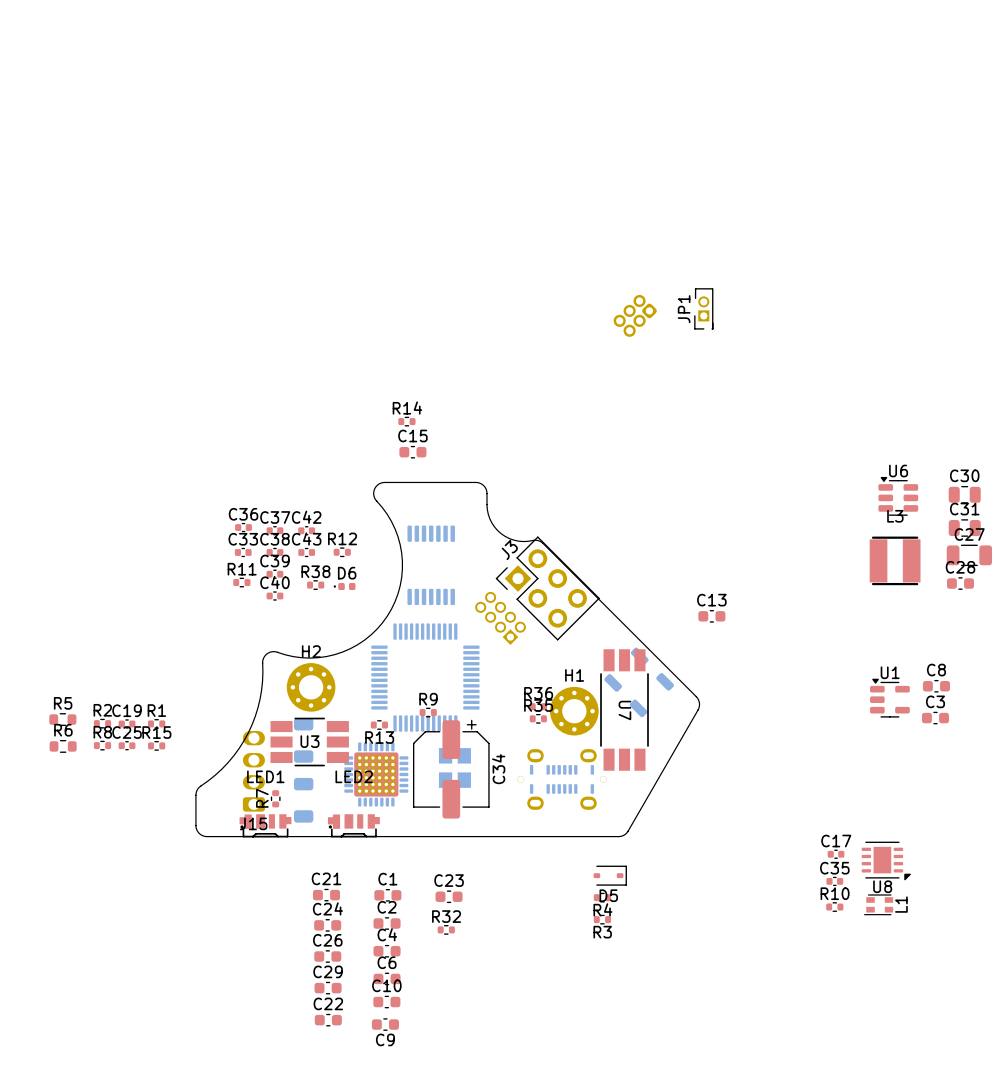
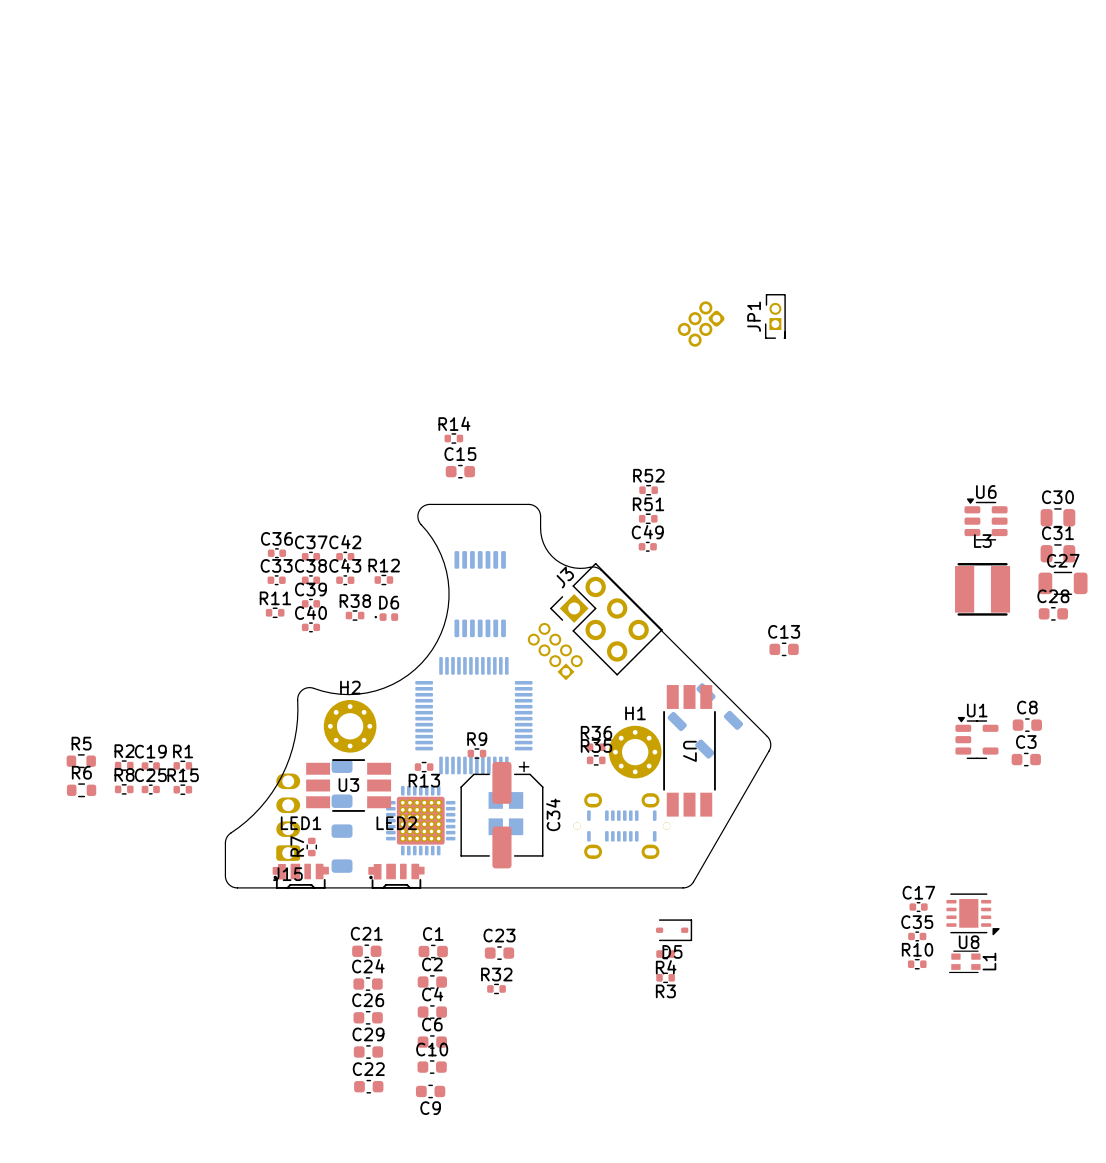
R52: none -> (648, 490)
R51: none -> (648, 518)
C49: none -> (647, 546)

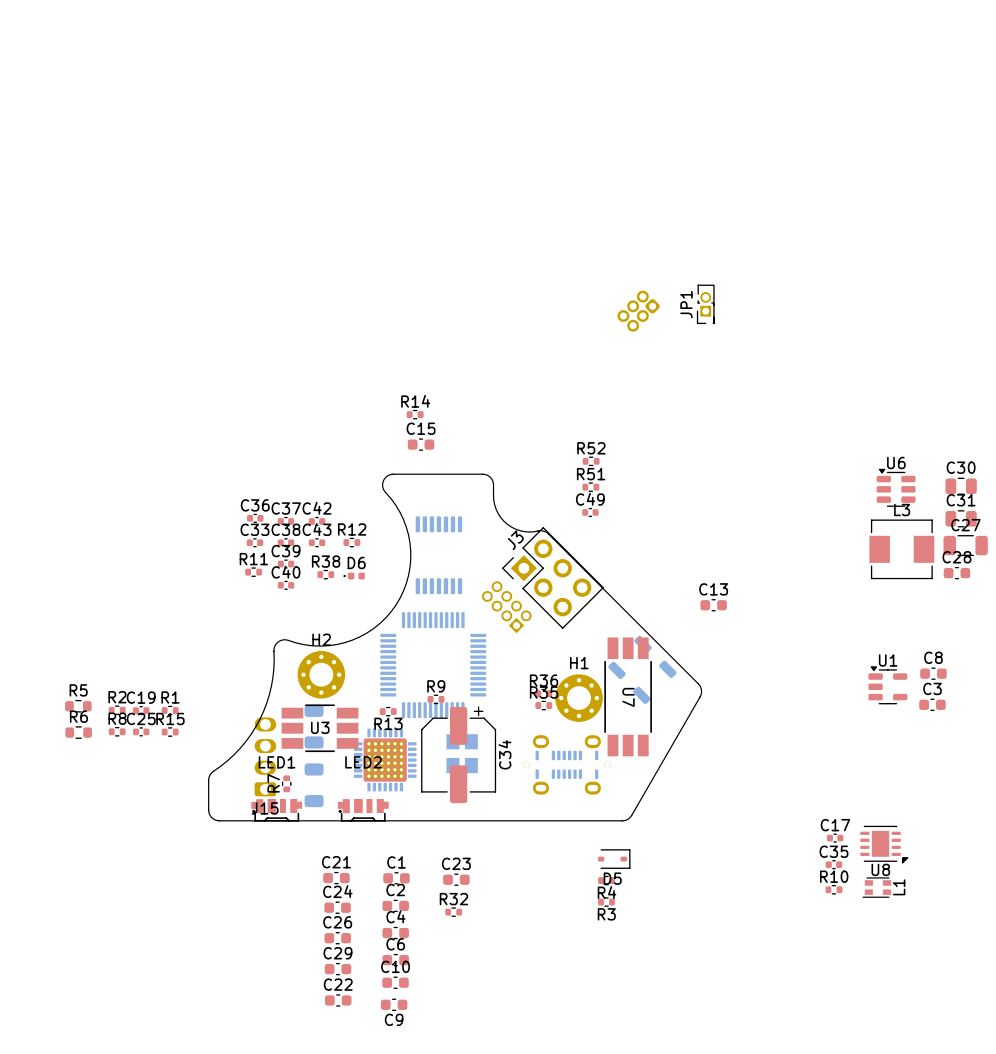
JP1 footprint: [764, 294, 786, 339] -> [696, 284, 715, 325]
L3 footprint: [955, 563, 1011, 616] -> [869, 519, 935, 580]

